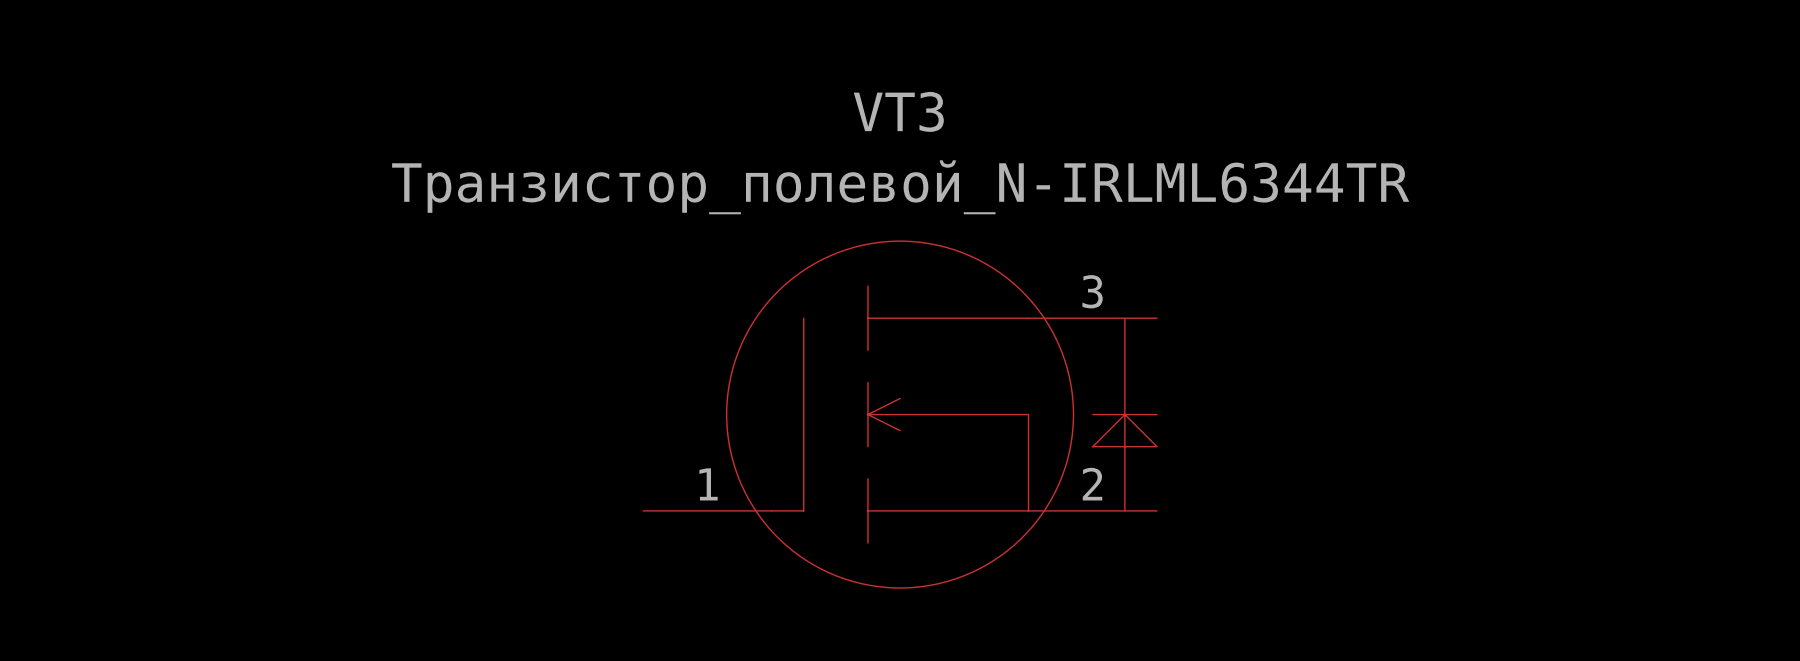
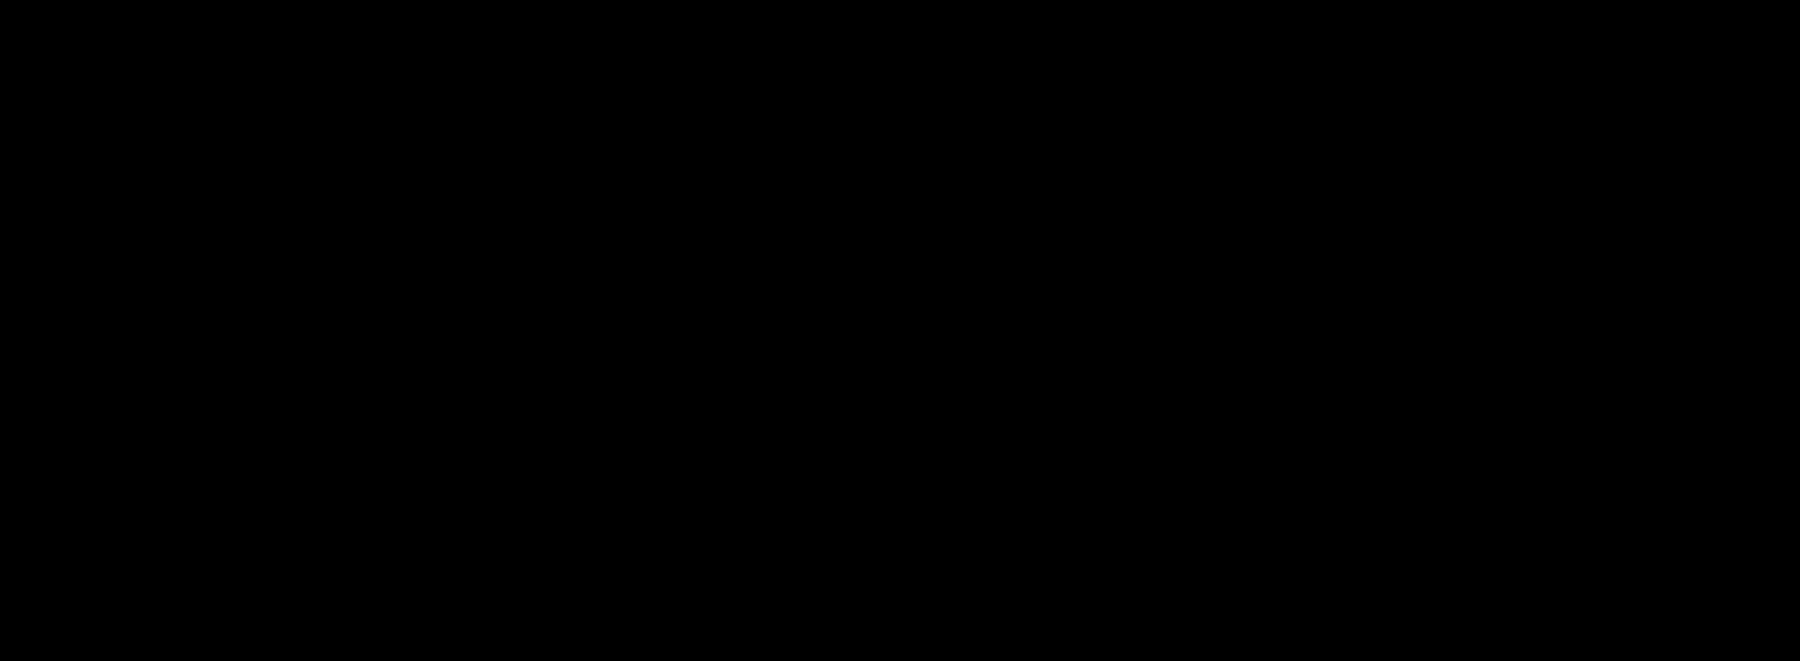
VT3: Транзистор_полевой_N-IRLML6344TR (900, 414) -> none

